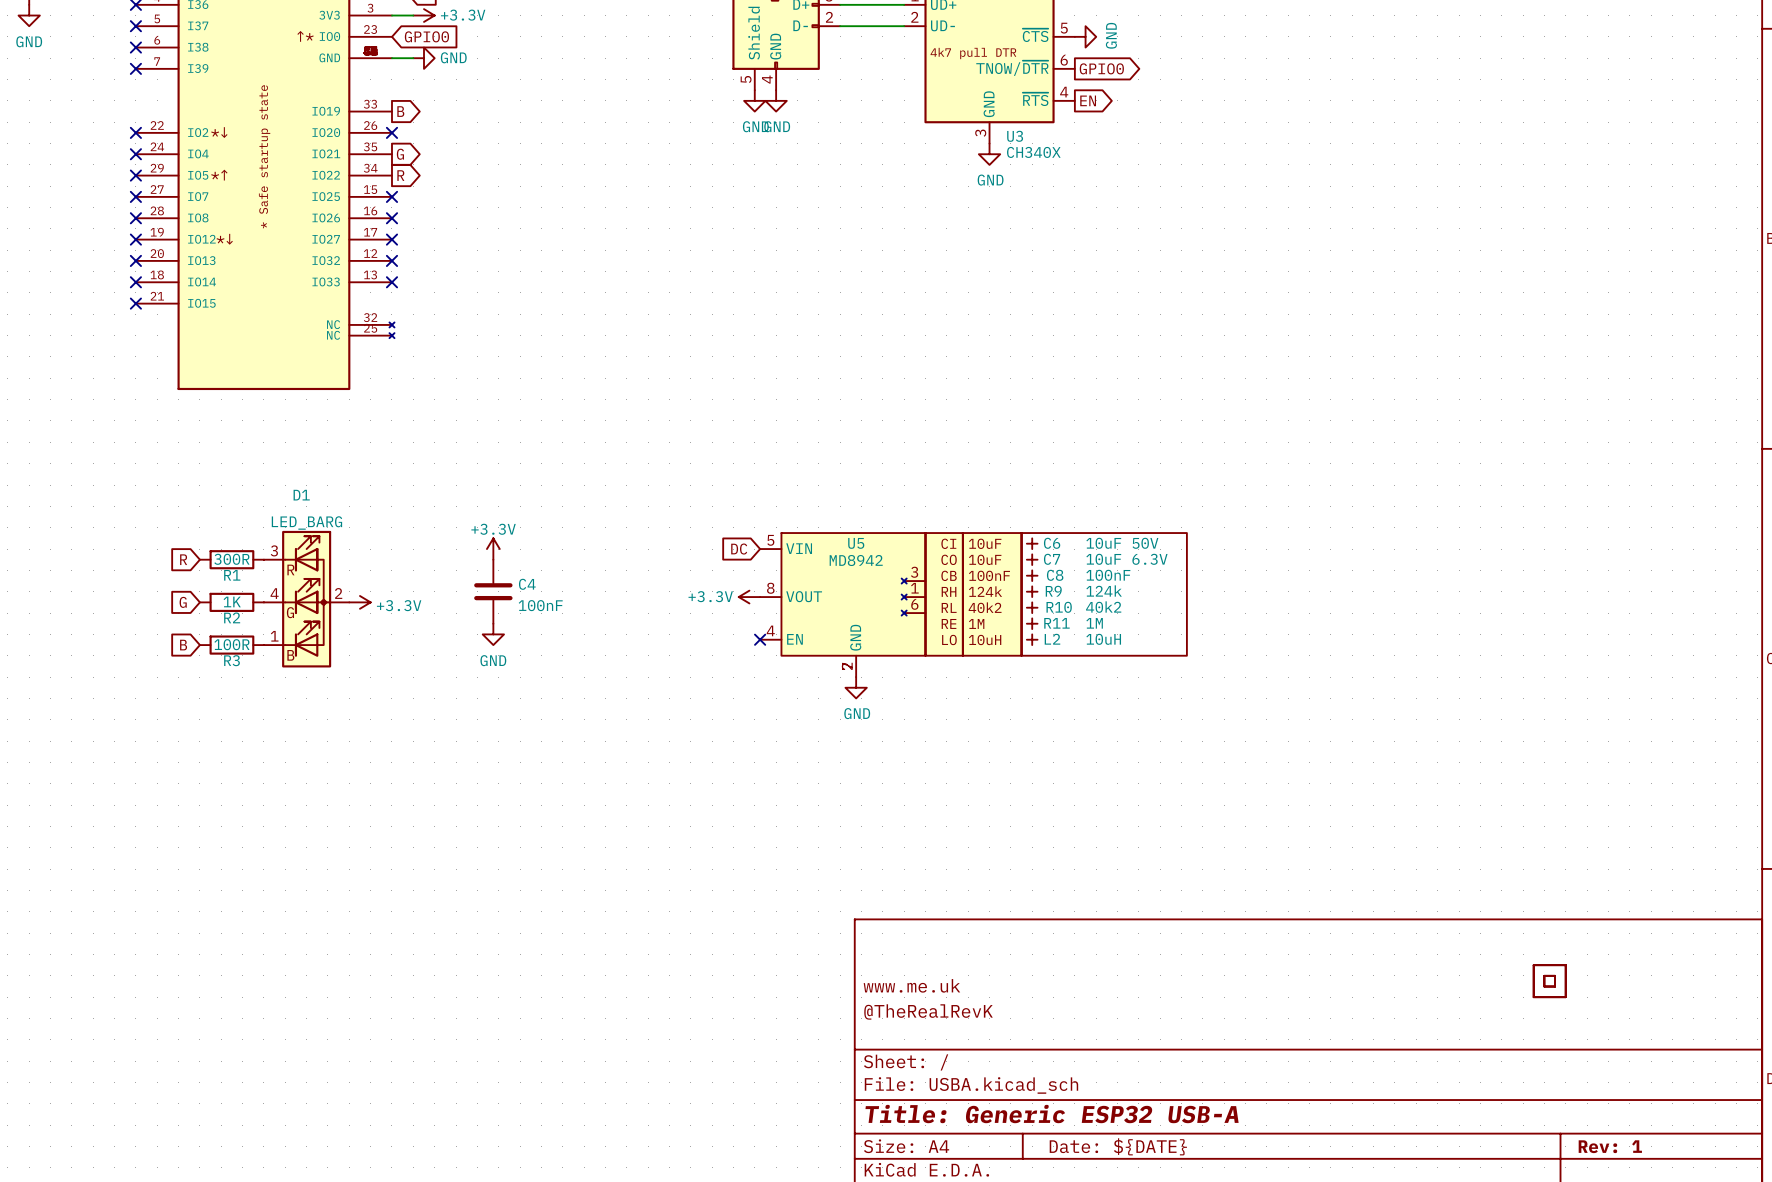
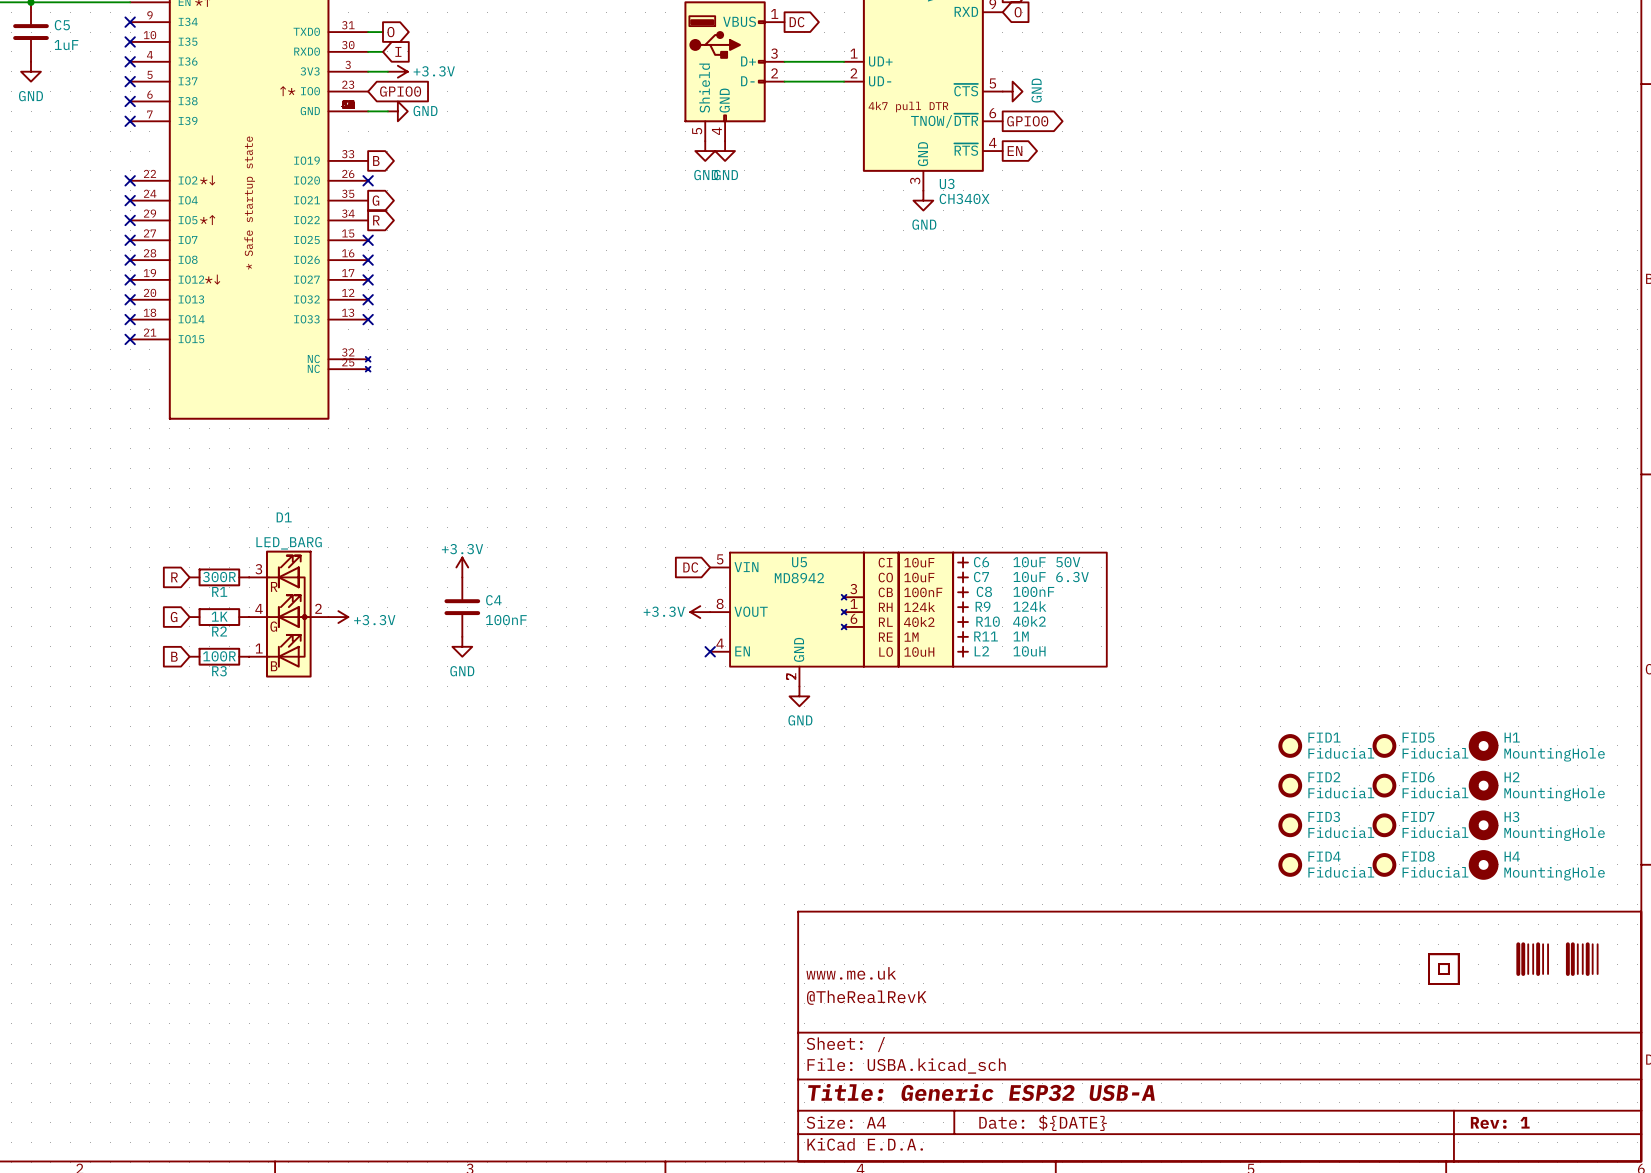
FID1: none -> Fiducial (1290, 745)
FID5: none -> Fiducial (1384, 745)
H1: none -> MountingHole (1483, 745)
FID2: none -> Fiducial (1290, 785)
FID6: none -> Fiducial (1384, 785)
H2: none -> MountingHole (1483, 785)
FID3: none -> Fiducial (1290, 825)
FID7: none -> Fiducial (1384, 825)
H3: none -> MountingHole (1483, 825)
FID4: none -> Fiducial (1290, 864)
FID8: none -> Fiducial (1384, 864)
H4: none -> MountingHole (1483, 864)
part: none -> (1532, 959)
part: none -> (1581, 959)

